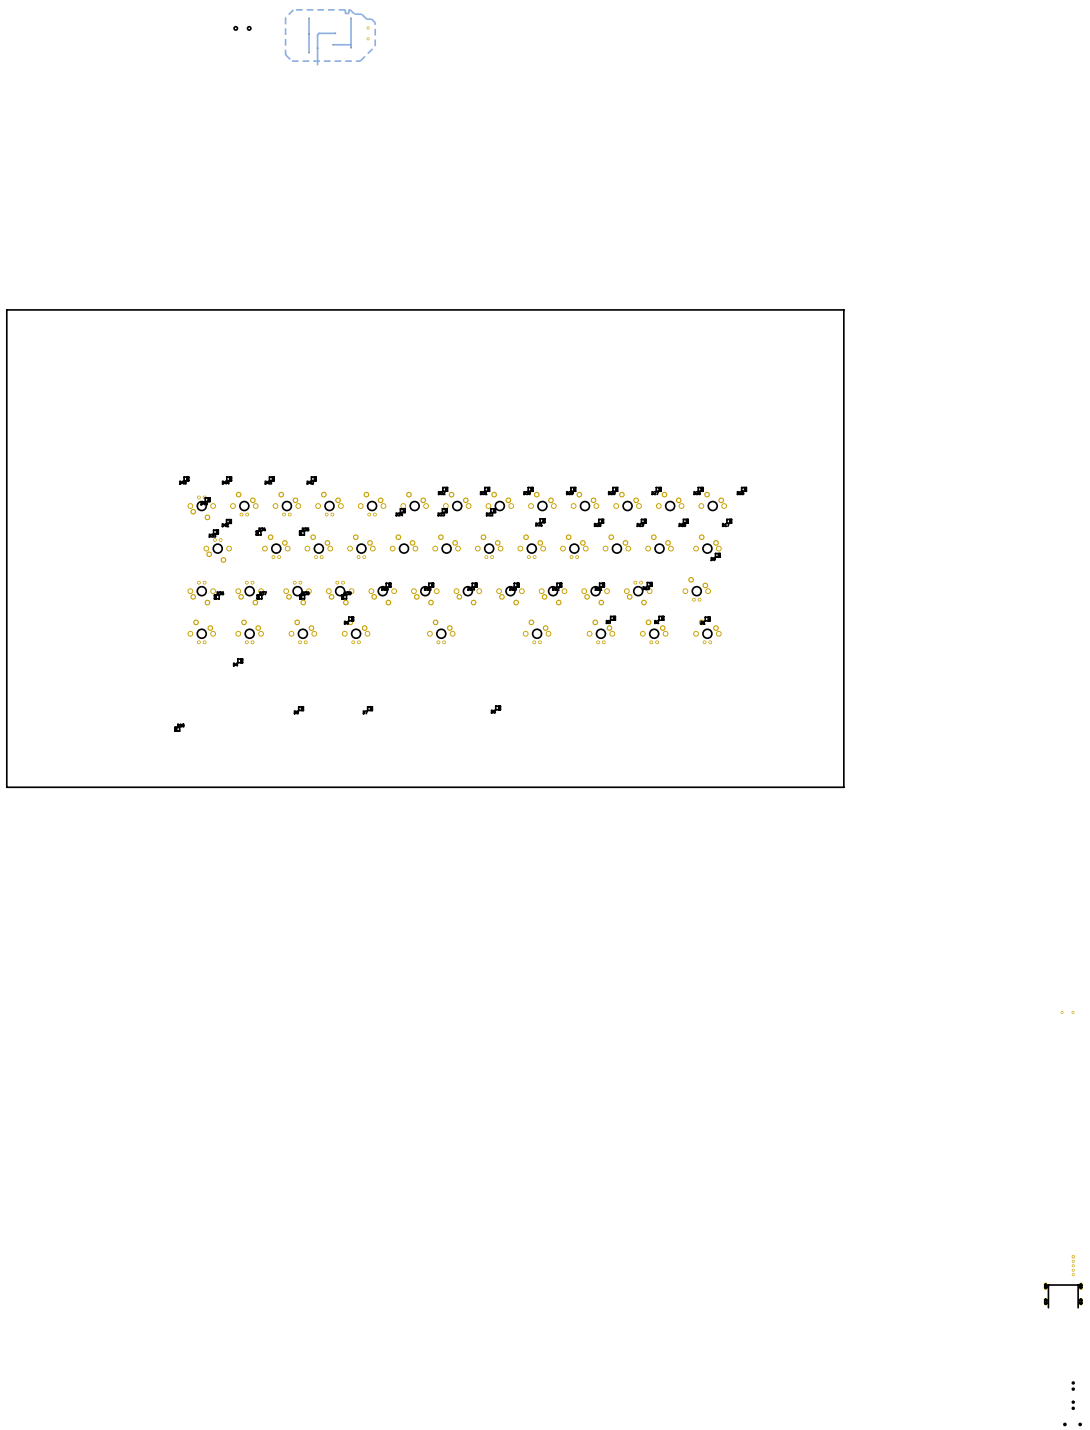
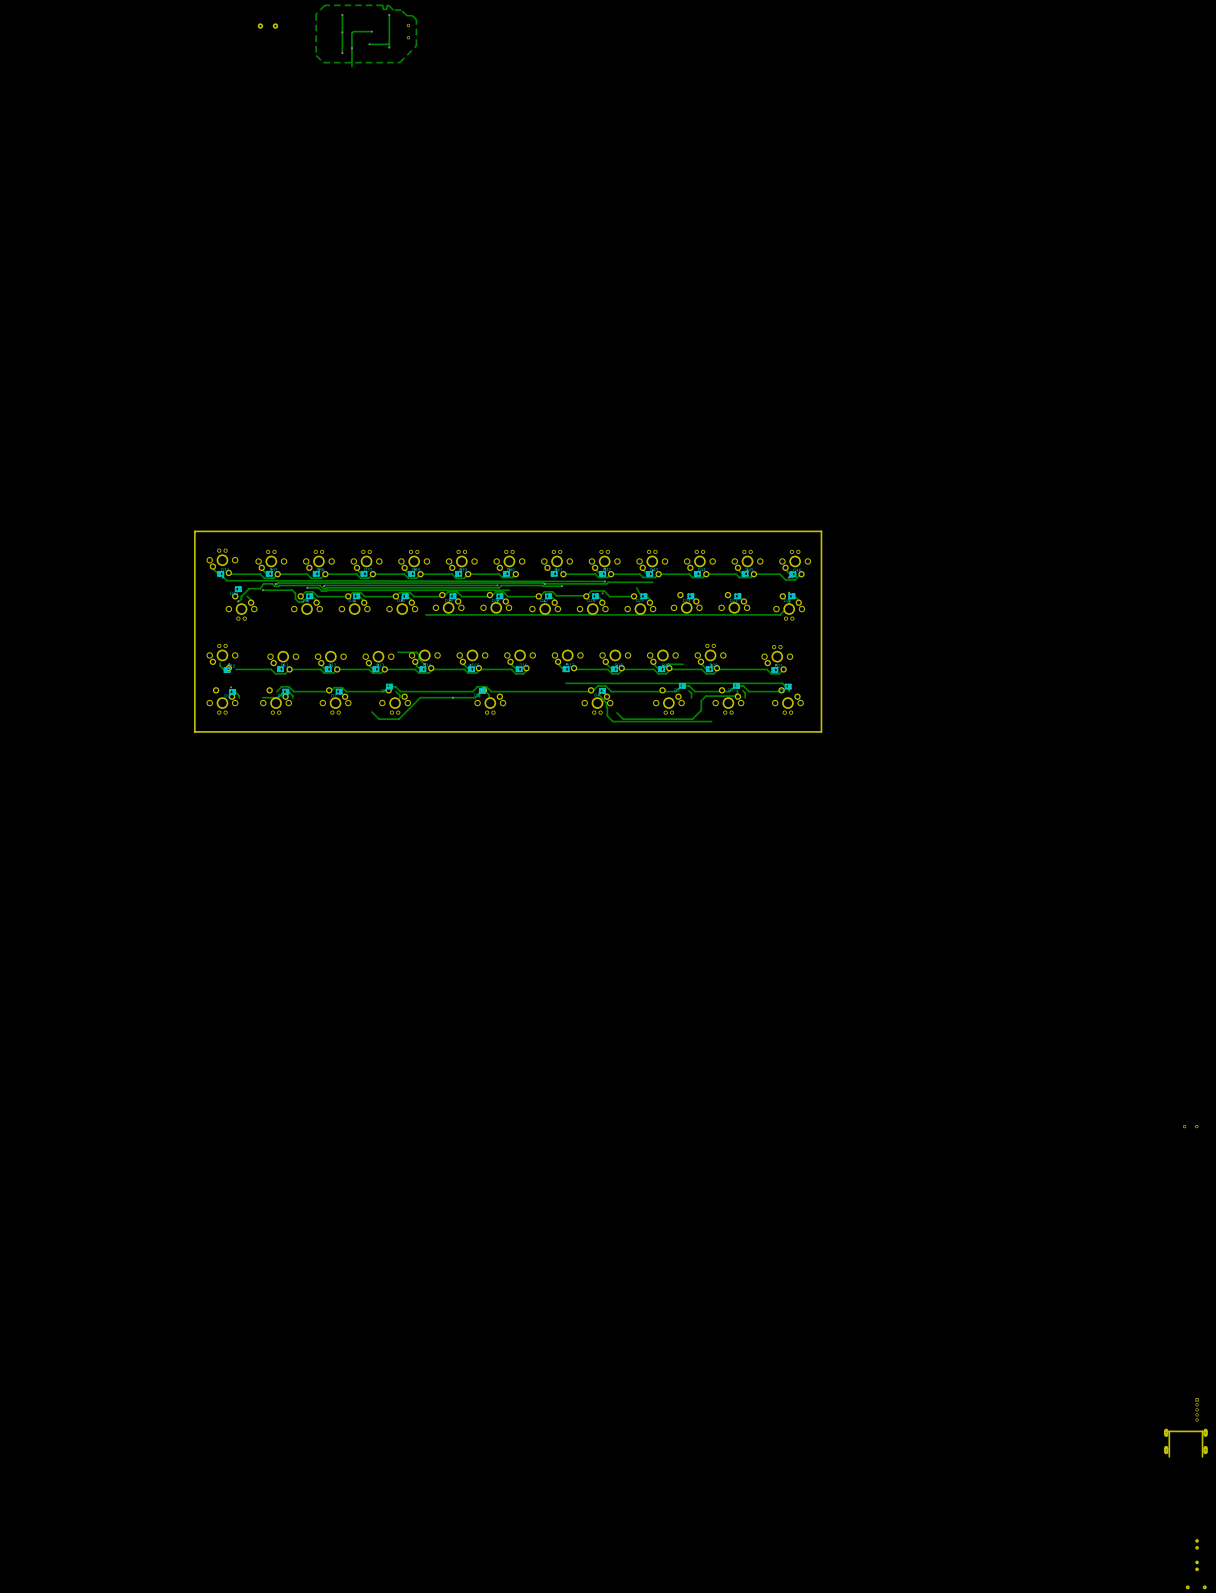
board edge: (843, 309) (6, 309) (6, 787) (843, 787) (843, 309) -> none
part rotation: 0° (186, 478) -> 180° (745, 573)
part position: (186, 478) -> (745, 573)
part rotation: 0° (229, 478) -> 180° (697, 573)
part position: (229, 478) -> (697, 573)
part rotation: 0° (271, 478) -> 180° (649, 573)
part position: (271, 478) -> (649, 573)
part rotation: 0° (313, 478) -> 180° (602, 573)
part position: (313, 478) -> (602, 573)
board edge: none -> (821, 531) (194, 531) (194, 731) (821, 731) (821, 531)
part position: (445, 489) -> (309, 596)
part position: (487, 489) -> (356, 596)
part position: (530, 489) -> (405, 596)
part position: (573, 489) -> (452, 596)
part position: (615, 489) -> (499, 596)
part position: (658, 489) -> (548, 596)
part position: (700, 489) -> (595, 596)
part position: (744, 489) -> (643, 596)
part rotation: 0° (207, 499) -> 180° (792, 574)
part position: (207, 499) -> (792, 574)
part: (414, 501) -> none
part: (457, 501) -> none
part: (499, 501) -> none
part: (542, 501) -> none
part: (584, 501) -> none
part: (627, 501) -> none
part: (670, 501) -> none
part: (712, 501) -> none
part rotation: 0° (244, 504) -> 180° (271, 563)
part rotation: 0° (286, 504) -> 180° (318, 563)
part rotation: 0° (329, 504) -> 180° (366, 563)
part rotation: 0° (372, 504) -> 180° (414, 563)
part: none -> (461, 563)
part: none -> (509, 563)
part: none -> (557, 563)
part: none -> (604, 563)
part: none -> (652, 563)
part: none -> (699, 563)
part: none -> (747, 563)
part: none -> (795, 563)
part position: (402, 510) -> (690, 596)
part position: (444, 510) -> (737, 596)
part position: (493, 510) -> (791, 596)
track: none -> (214, 567) (217, 573)
track: none -> (261, 567) (266, 573)
track: none -> (357, 567) (361, 573)
track: none -> (404, 567) (408, 573)
track: none -> (595, 567) (599, 573)
track: none -> (642, 567) (646, 573)
track: none -> (737, 567) (742, 573)
track: none -> (785, 567) (790, 574)
via: none -> (605, 568)
via: none -> (271, 569)
via: none -> (319, 569)
via: none -> (414, 569)
via: none -> (460, 569)
via: none -> (509, 569)
via: none -> (556, 569)
via: none -> (652, 570)
via: none -> (747, 570)
track: none -> (515, 574) (512, 577) (502, 577) (499, 574) (468, 574) (464, 578) (456, 578) (452, 574) (420, 574) (416, 578) (408, 578) (404, 574) (372, 574) (368, 578) (360, 578) (356, 574) (325, 574) (321, 578) (311, 578) (307, 574) (277, 574) (273, 578) (264, 578) (260, 574) (230, 574)
track: none -> (795, 574) (792, 577) (788, 577)
track: none -> (801, 574) (795, 579) (785, 579) (779, 574) (753, 574) (750, 577) (739, 577) (736, 574) (706, 574) (702, 577) (692, 577) (689, 574) (658, 574) (655, 577) (643, 577) (639, 574) (611, 574) (607, 577) (598, 577) (595, 574) (563, 574)
part rotation: 0° (542, 520) -> 180° (774, 669)
part position: (542, 520) -> (774, 669)
track: none -> (223, 577) (223, 573) (223, 577) (227, 580) (605, 581)
via: none -> (223, 577)
part rotation: 0° (228, 521) -> 180° (554, 573)
part position: (228, 521) -> (554, 573)
part rotation: 0° (601, 521) -> 180° (709, 669)
part position: (601, 521) -> (709, 669)
part rotation: 0° (643, 521) -> 180° (661, 669)
part position: (643, 521) -> (661, 669)
part rotation: 0° (685, 521) -> 180° (614, 669)
part position: (685, 521) -> (614, 669)
via: none -> (788, 577)
part rotation: 0° (729, 521) -> 180° (566, 669)
part position: (729, 521) -> (566, 669)
via: none -> (605, 581)
track: none -> (652, 582) (275, 583)
via: none -> (275, 583)
via: none -> (544, 583)
track: none -> (497, 585) (324, 586)
via: none -> (497, 585)
via: none -> (324, 586)
track: none -> (562, 586) (323, 588) (320, 585) (274, 586) (272, 583) (263, 583) (260, 588) (249, 588) (238, 601)
via: none -> (562, 586)
track: none -> (307, 587) (318, 587) (321, 591) (509, 590)
via: none -> (307, 587)
track: none -> (636, 587) (641, 596)
track: none -> (262, 590) (292, 590) (298, 602) (302, 602) (306, 597)
via: none -> (262, 590)
part position: (258, 533) -> (220, 573)
part position: (301, 533) -> (269, 573)
part footprint: [262, 534, 291, 560] -> [291, 593, 323, 615]
part footprint: [304, 534, 334, 560] -> [338, 593, 371, 615]
part footprint: [347, 534, 376, 560] -> [386, 593, 419, 615]
part footprint: [474, 534, 504, 560] -> [529, 593, 562, 615]
part footprint: [517, 534, 547, 560] -> [576, 593, 609, 615]
part footprint: [560, 534, 589, 560] -> [624, 593, 657, 615]
via: none -> (602, 593)
track: none -> (788, 592) (789, 605) (780, 614) (425, 614)
via: none -> (788, 592)
track: none -> (247, 596) (251, 602)
track: none -> (312, 596) (316, 602)
track: none -> (359, 596) (364, 602)
track: none -> (402, 596) (402, 600)
track: none -> (407, 596) (411, 602)
track: none -> (551, 596) (554, 602)
track: none -> (598, 596) (602, 602)
track: none -> (634, 596) (609, 596) (604, 591) (591, 591) (586, 596) (556, 595) (552, 591) (544, 591) (538, 596) (507, 596) (503, 591) (495, 591) (490, 596) (461, 596) (457, 591) (448, 591) (443, 596) (414, 596) (410, 592) (399, 592) (395, 596) (364, 596) (360, 592) (352, 592) (348, 596) (317, 596) (312, 591) (305, 591) (300, 596)
track: none -> (646, 596) (649, 602)
track: none -> (794, 596) (798, 602)
via: none -> (238, 601)
via: none -> (307, 600)
via: none -> (354, 601)
via: none -> (402, 600)
via: none -> (449, 600)
via: none -> (497, 600)
via: none -> (544, 601)
part: (707, 543) -> none
part: none -> (789, 606)
part rotation: 0° (217, 550) -> 180° (241, 606)
part position: (717, 555) -> (232, 691)
part rotation: 0° (649, 584) -> 180° (227, 670)
part position: (649, 584) -> (227, 670)
part rotation: 0° (388, 585) -> 180° (519, 669)
part position: (388, 585) -> (519, 669)
part rotation: 0° (431, 585) -> 180° (471, 669)
part position: (431, 585) -> (471, 669)
part rotation: 0° (474, 585) -> 180° (422, 669)
part position: (474, 585) -> (422, 669)
part rotation: 0° (516, 585) -> 180° (375, 669)
part position: (516, 585) -> (375, 669)
part rotation: 0° (559, 585) -> 180° (328, 669)
part position: (559, 585) -> (328, 669)
part rotation: 0° (601, 585) -> 180° (280, 669)
part position: (601, 585) -> (280, 669)
track: none -> (398, 652) (416, 652) (418, 658) (425, 664) (425, 669)
part rotation: 0° (696, 589) -> 180° (777, 658)
part: (249, 593) -> none
part: (297, 593) -> none
part: (340, 593) -> none
part position: (216, 596) -> (316, 573)
part position: (259, 596) -> (363, 573)
part position: (302, 596) -> (411, 573)
part position: (344, 596) -> (458, 573)
track: none -> (220, 663) (224, 670)
part: none -> (283, 662)
track: none -> (321, 663) (325, 669)
part: none -> (330, 662)
track: none -> (368, 663) (373, 669)
part: none -> (378, 662)
track: none -> (416, 663) (420, 669)
track: none -> (464, 663) (468, 669)
track: none -> (511, 663) (516, 669)
track: none -> (559, 663) (563, 669)
track: none -> (607, 663) (611, 669)
track: none -> (654, 663) (658, 669)
track: none -> (702, 663) (706, 669)
via: none -> (229, 664)
via: none -> (283, 665)
via: none -> (330, 665)
via: none -> (378, 665)
via: none -> (425, 664)
via: none -> (470, 665)
via: none -> (566, 664)
track: none -> (683, 664) (667, 664) (664, 669)
via: none -> (711, 665)
via: none -> (776, 665)
via: none -> (616, 665)
via: none -> (663, 665)
track: none -> (527, 669) (523, 673) (515, 673) (511, 669) (480, 669) (476, 673) (468, 673) (464, 669) (432, 669) (428, 673) (418, 673) (415, 669) (384, 669) (381, 673) (372, 673) (369, 669) (337, 669) (333, 673) (324, 673) (320, 669) (289, 669) (285, 673) (275, 673) (271, 669) (236, 669)
track: none -> (783, 669) (779, 673) (771, 673) (766, 669) (718, 669) (713, 673) (706, 673) (701, 669) (670, 669) (666, 673) (658, 673) (653, 669) (622, 669) (618, 673) (612, 673) (607, 669) (575, 669)
track: none -> (566, 683) (782, 683) (789, 691)
via: none -> (231, 687)
track: none -> (485, 690) (489, 694) (489, 697)
track: none -> (599, 690) (599, 695) (606, 703) (607, 715) (612, 721) (711, 721)
track: none -> (688, 690) (691, 693) (691, 697)
track: none -> (737, 690) (734, 696) (706, 696) (701, 700) (701, 710) (692, 719) (623, 719) (616, 712)
track: none -> (742, 690) (745, 697)
track: none -> (235, 691) (239, 697)
track: none -> (283, 691) (277, 697) (262, 697)
track: none -> (288, 691) (292, 697)
track: none -> (396, 691) (399, 697)
track: none -> (782, 691) (748, 691) (743, 686) (734, 686) (729, 691) (694, 691) (689, 686) (681, 686) (675, 691) (611, 691) (605, 686) (597, 686) (592, 691) (491, 691) (486, 686) (477, 686) (473, 691) (400, 691) (395, 686) (388, 686) (384, 691) (346, 691) (342, 687) (334, 687) (330, 691) (293, 691) (289, 686) (281, 686) (276, 691)
via: none -> (453, 697)
track: none -> (479, 696) (479, 690) (475, 697) (420, 697) (398, 719) (379, 719) (371, 712)
part position: (240, 660) -> (602, 690)
part position: (498, 707) -> (482, 690)
part position: (301, 708) -> (285, 691)
part position: (370, 708) -> (339, 691)
part position: (177, 729) -> (506, 573)

